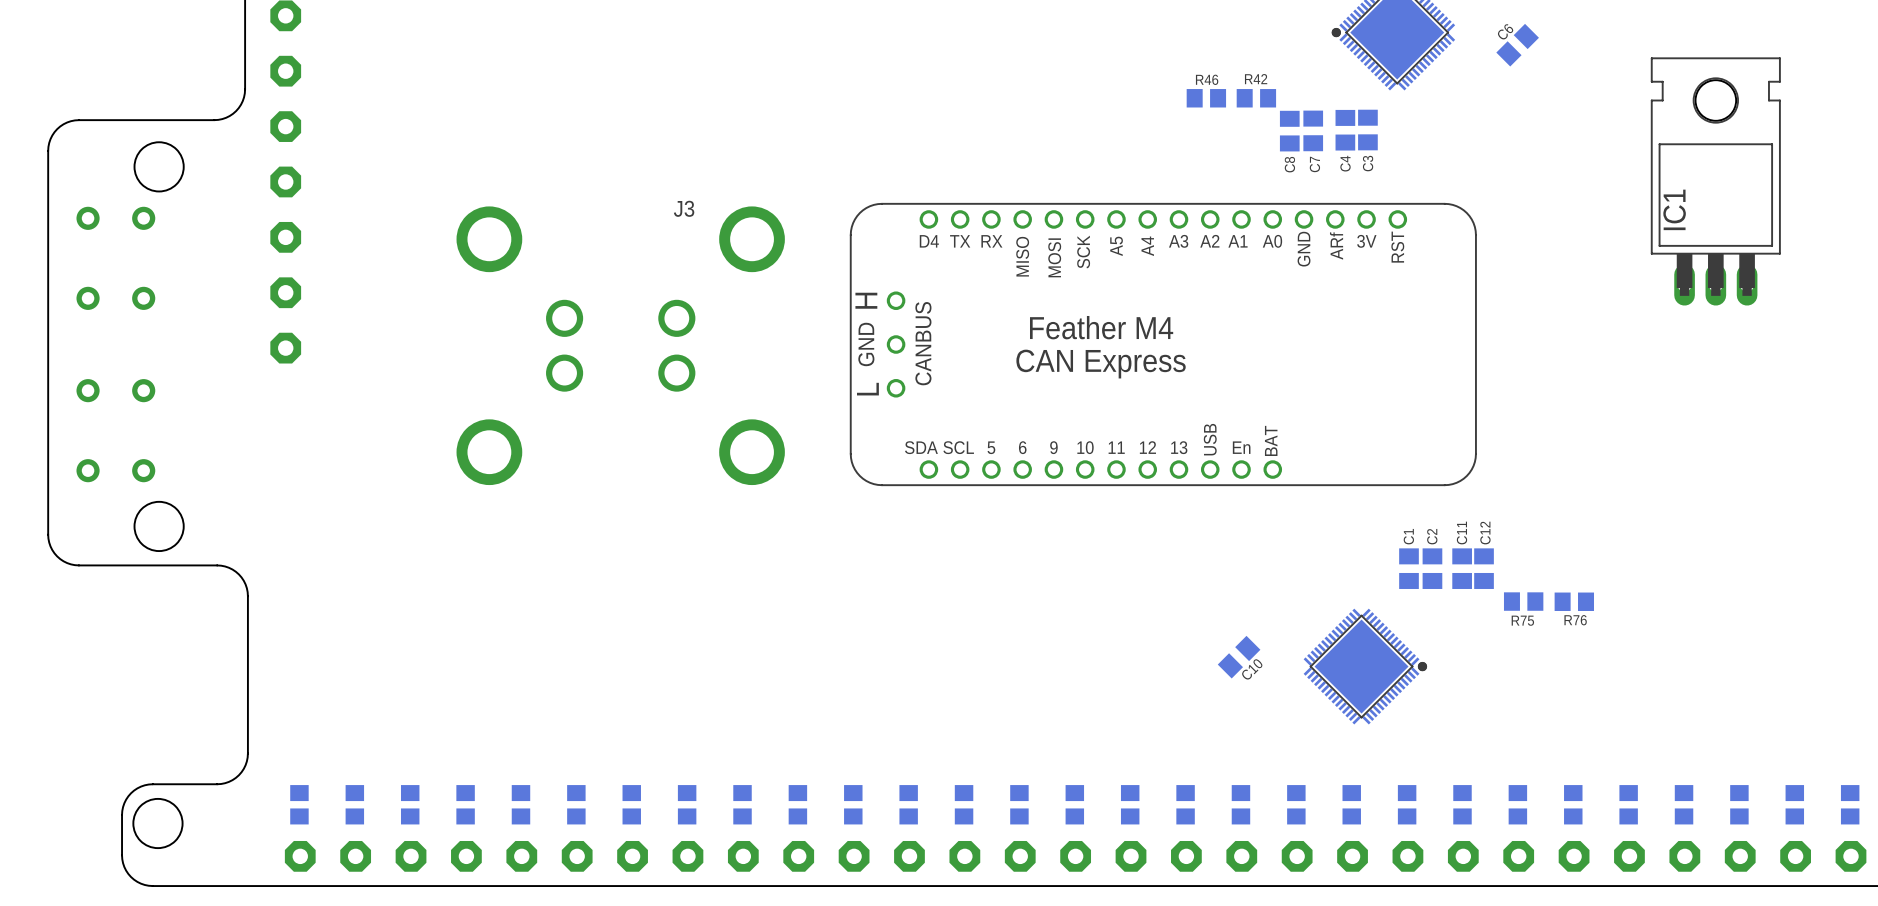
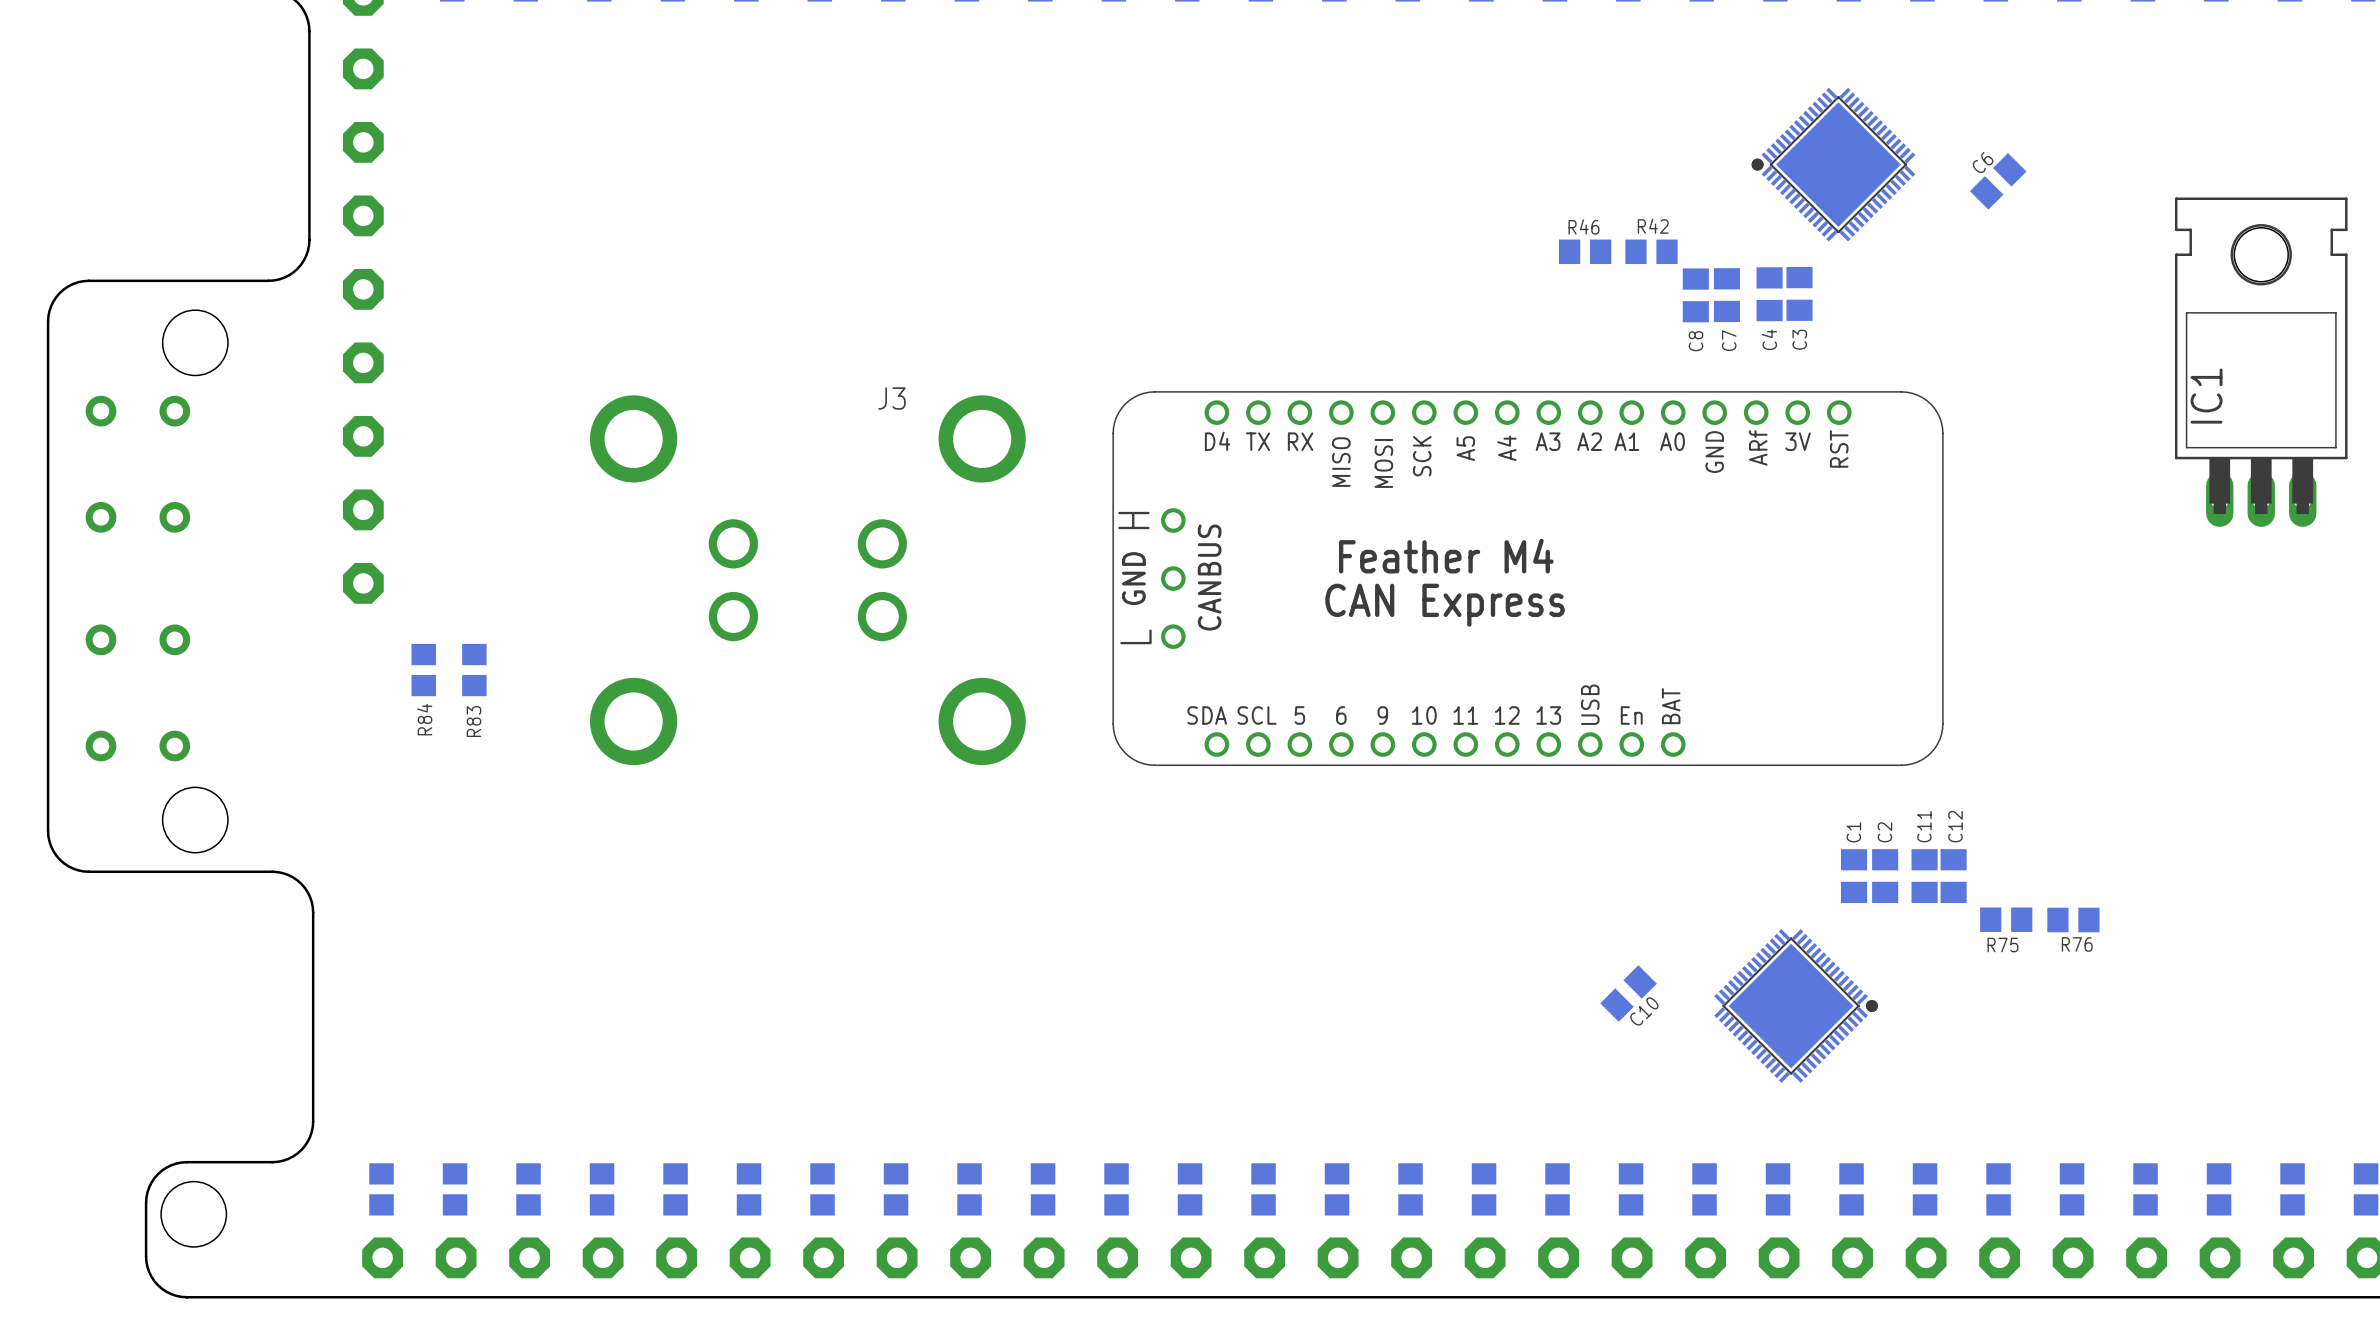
R84: none -> (423, 670)
R83: none -> (474, 670)

